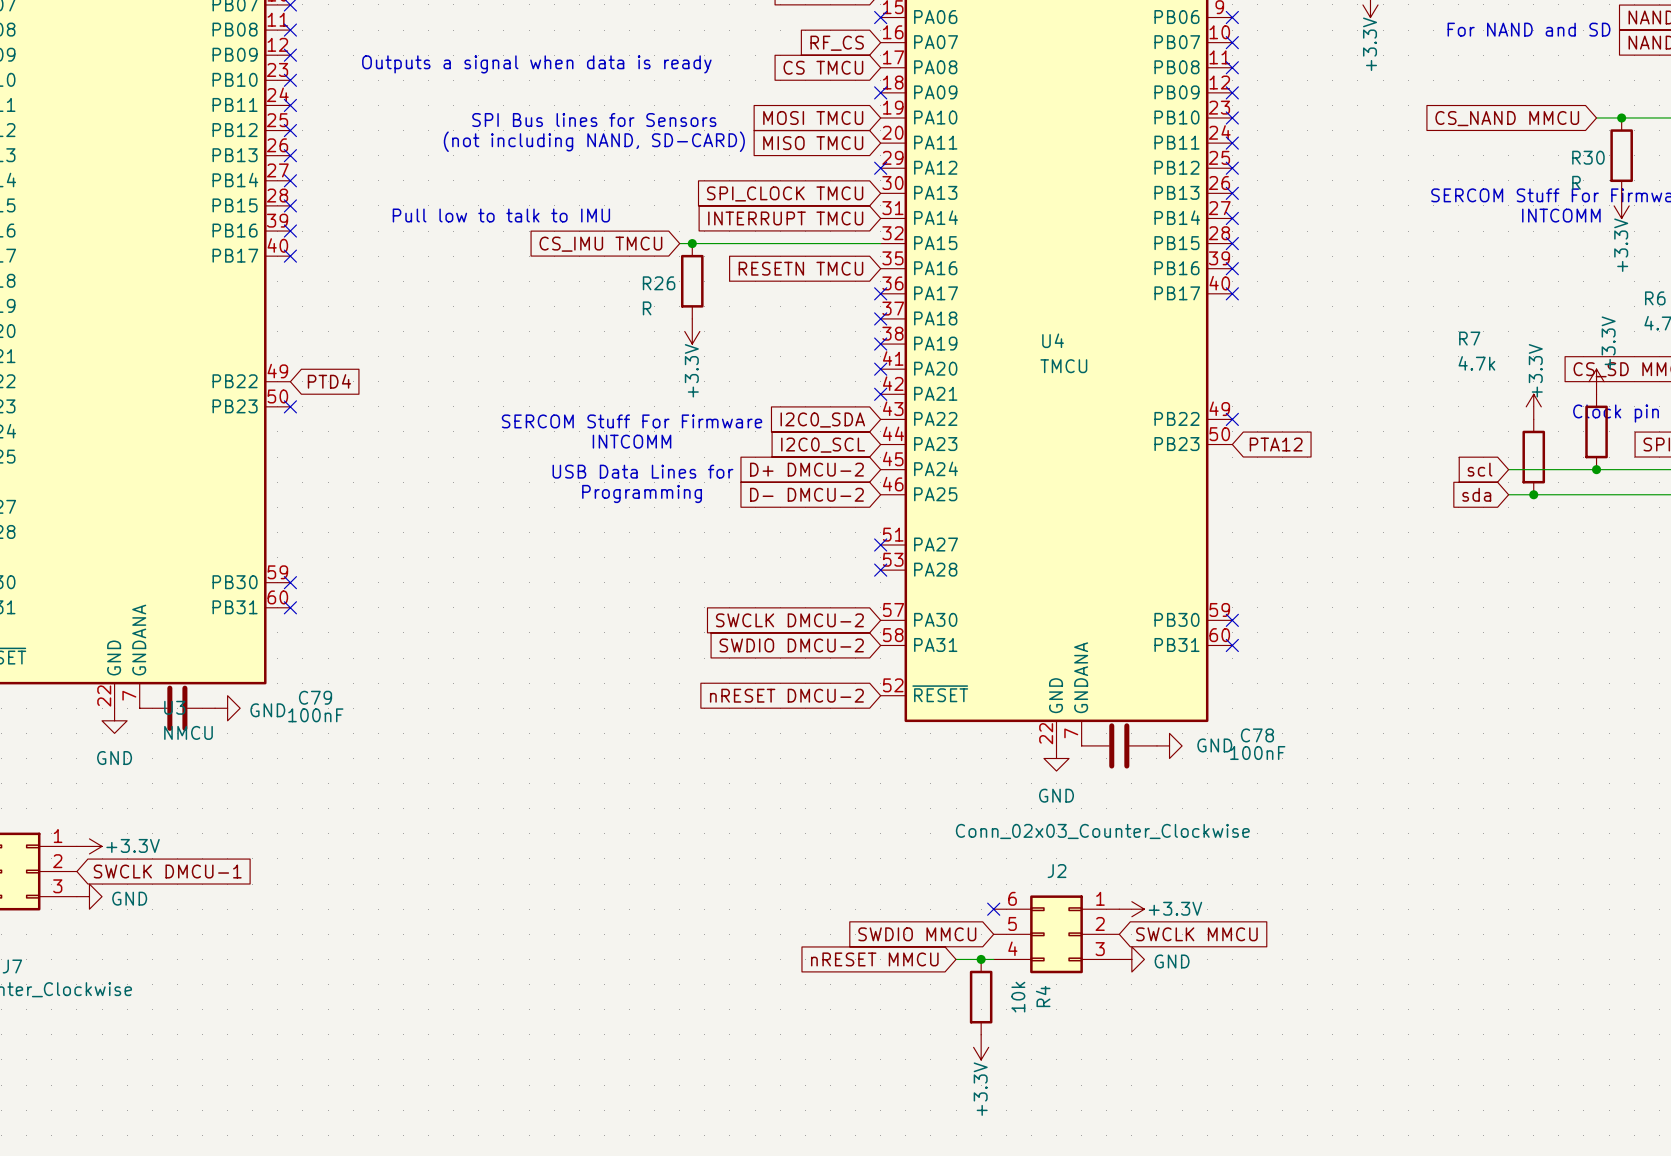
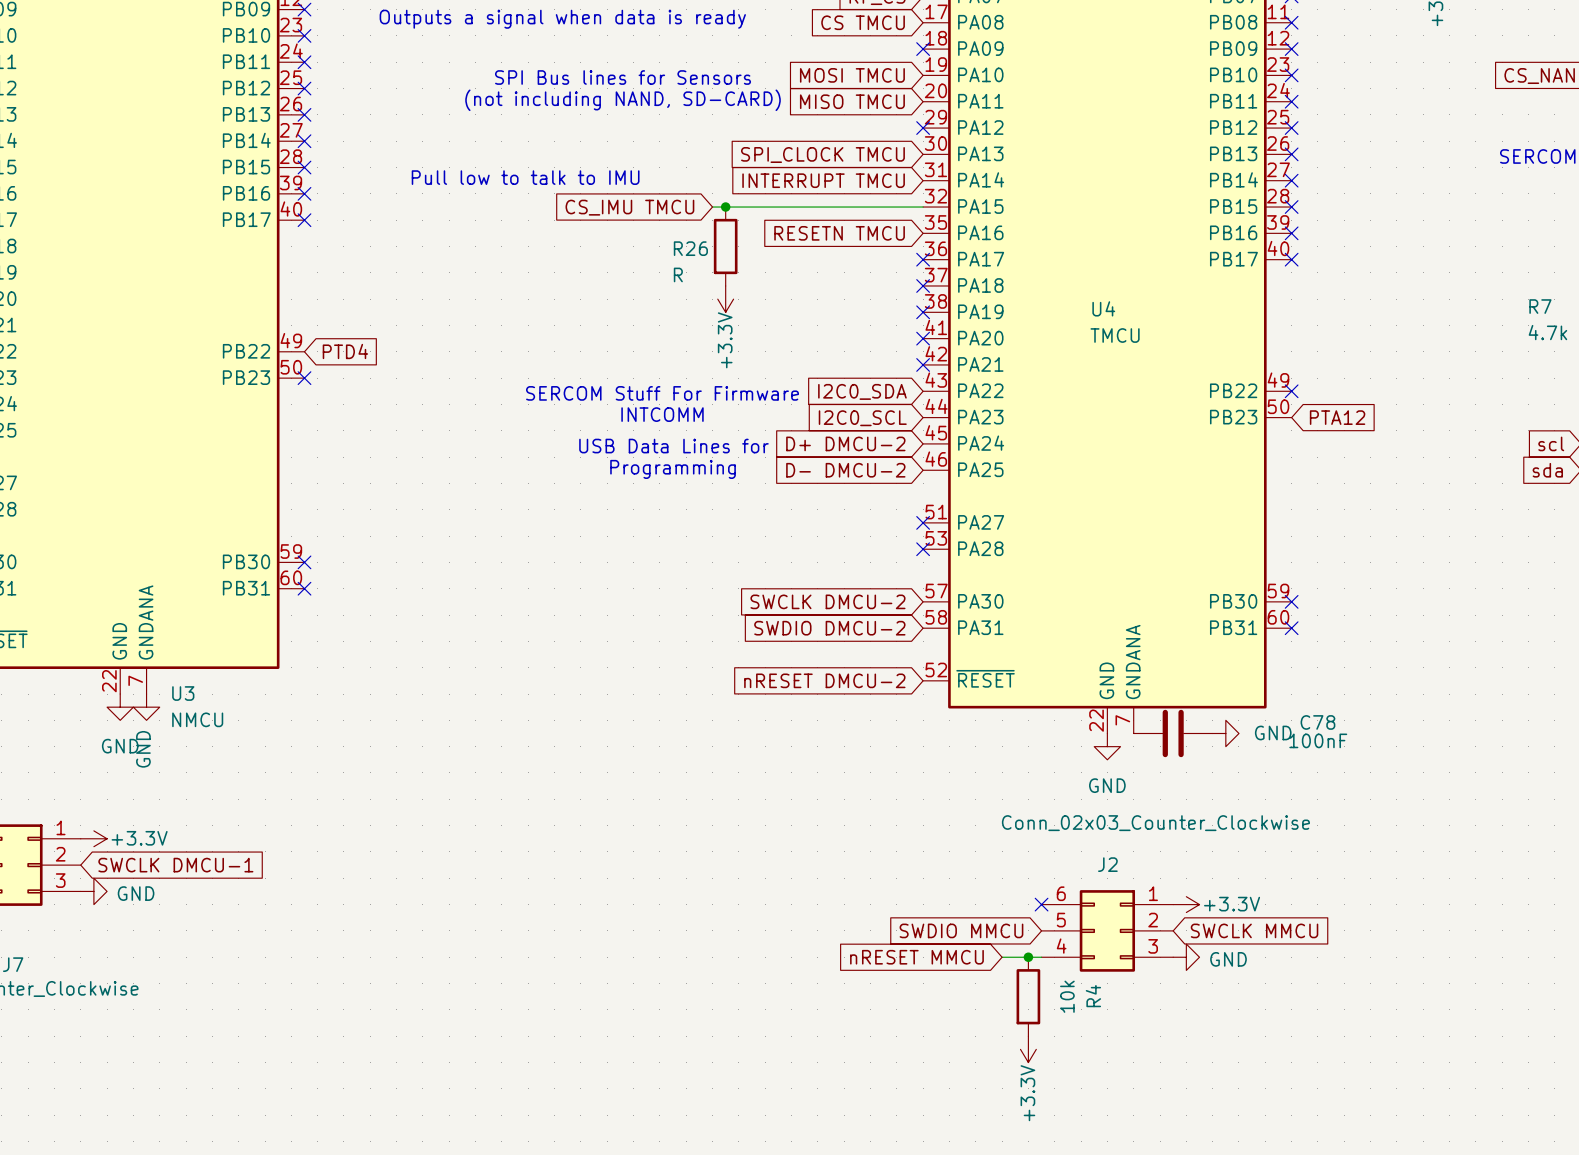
C79: 100nF (177, 708) -> none
power symbol rotation: 0° (227, 708) -> 90° clockwise (146, 707)
power symbol position: GND (227, 708) -> GND (146, 707)

